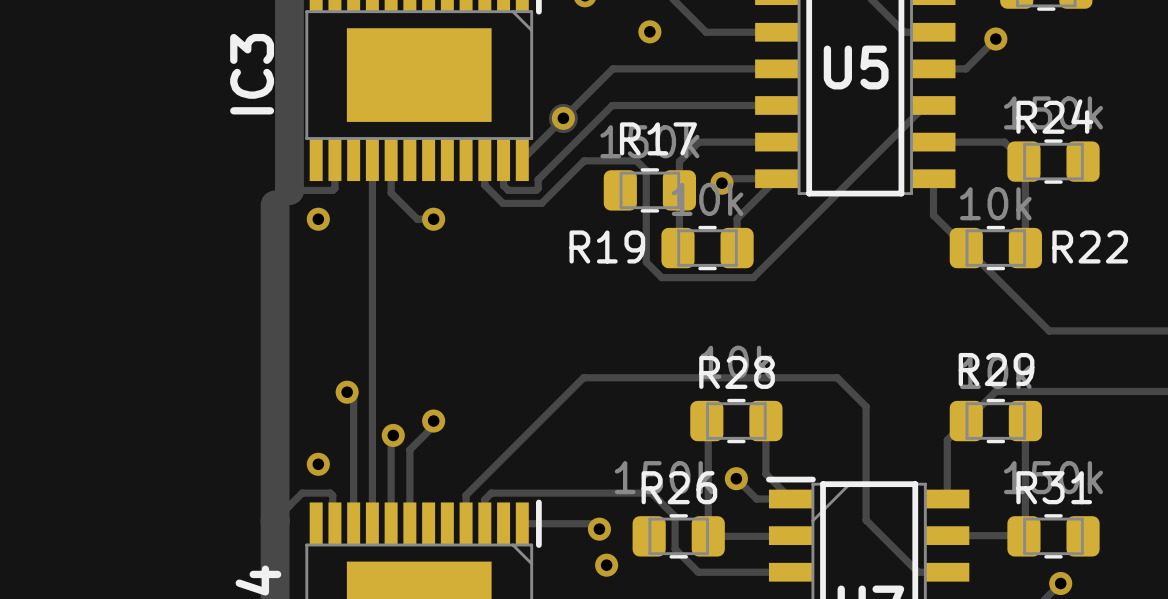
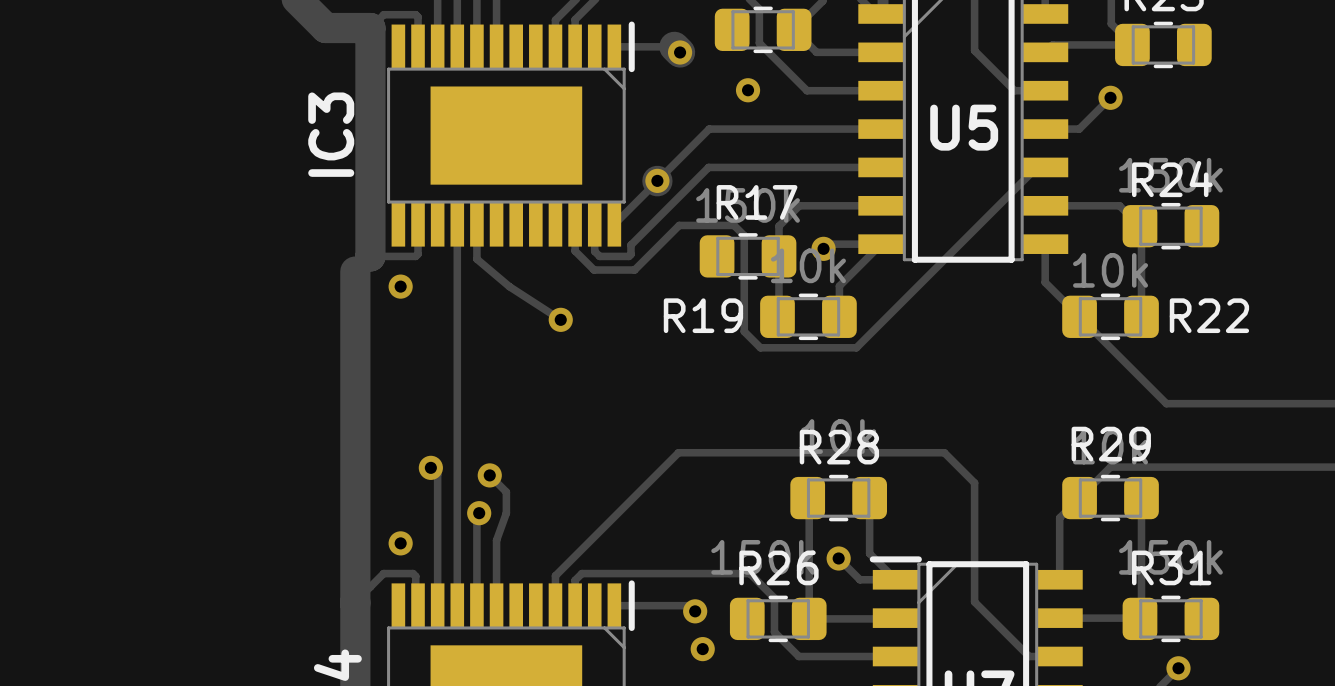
track: (391, 193) (417, 219) (433, 219) -> (476, 259) (509, 286) (560, 319)
via position: (433, 219) -> (560, 319)
track: (433, 421) (433, 426) (409, 449) (409, 461) -> (489, 475) (506, 492) (506, 513) (496, 540)
via position: (433, 421) -> (489, 475)

